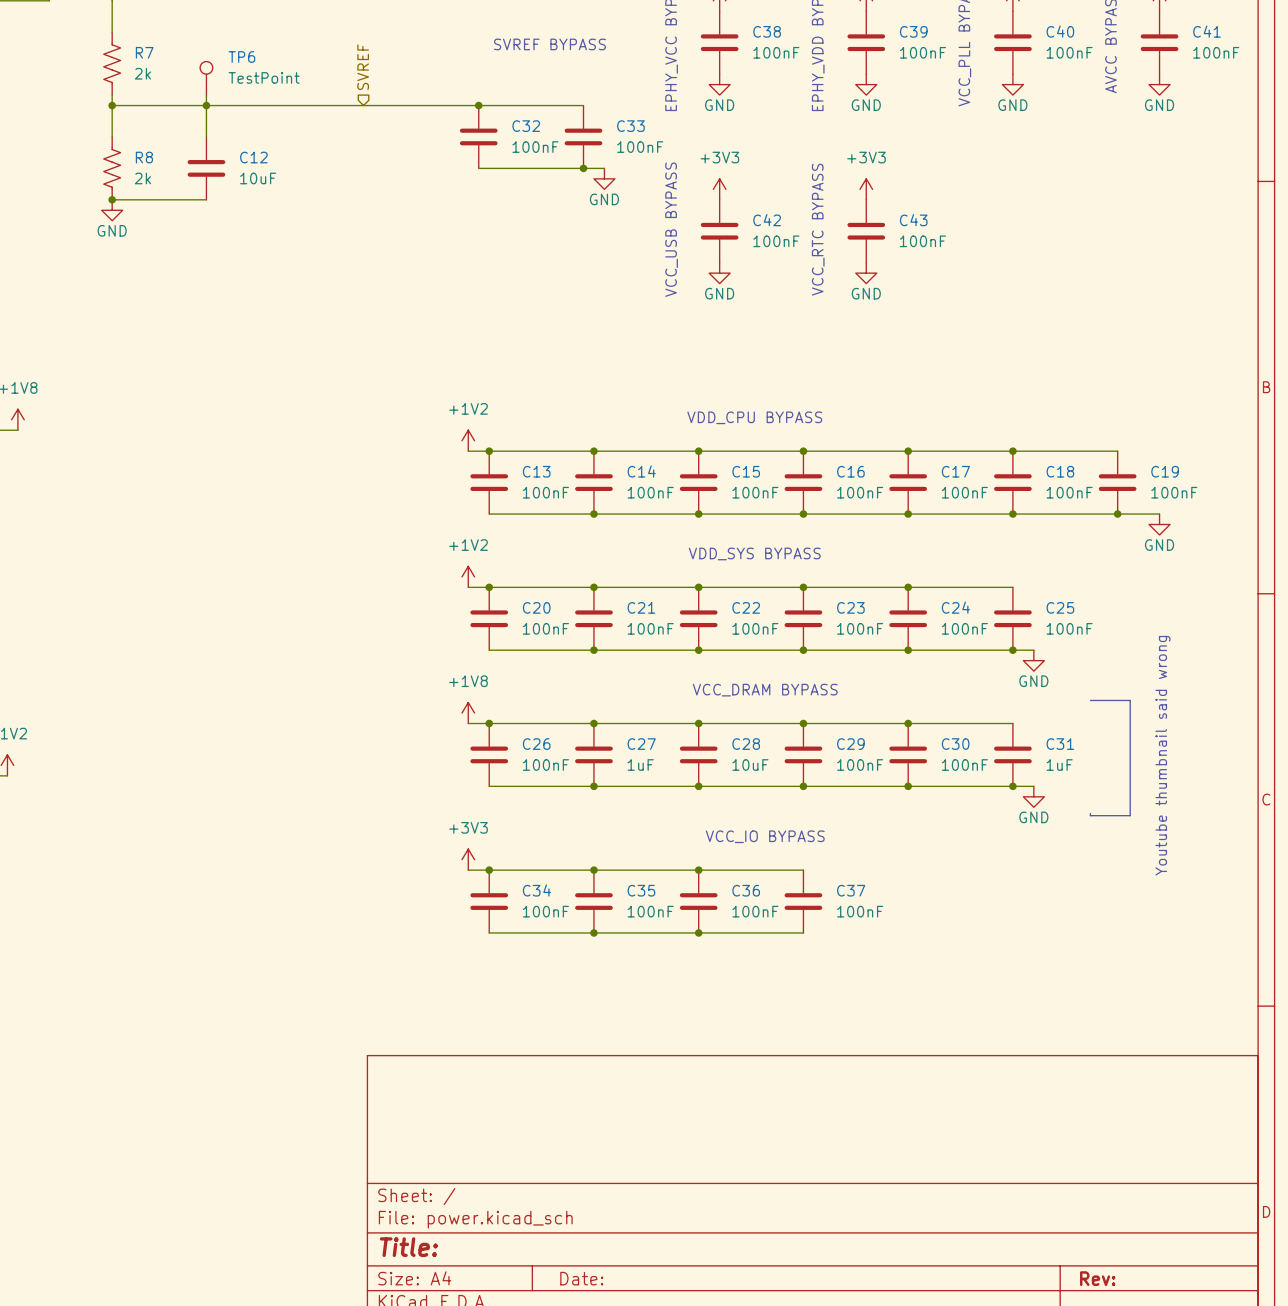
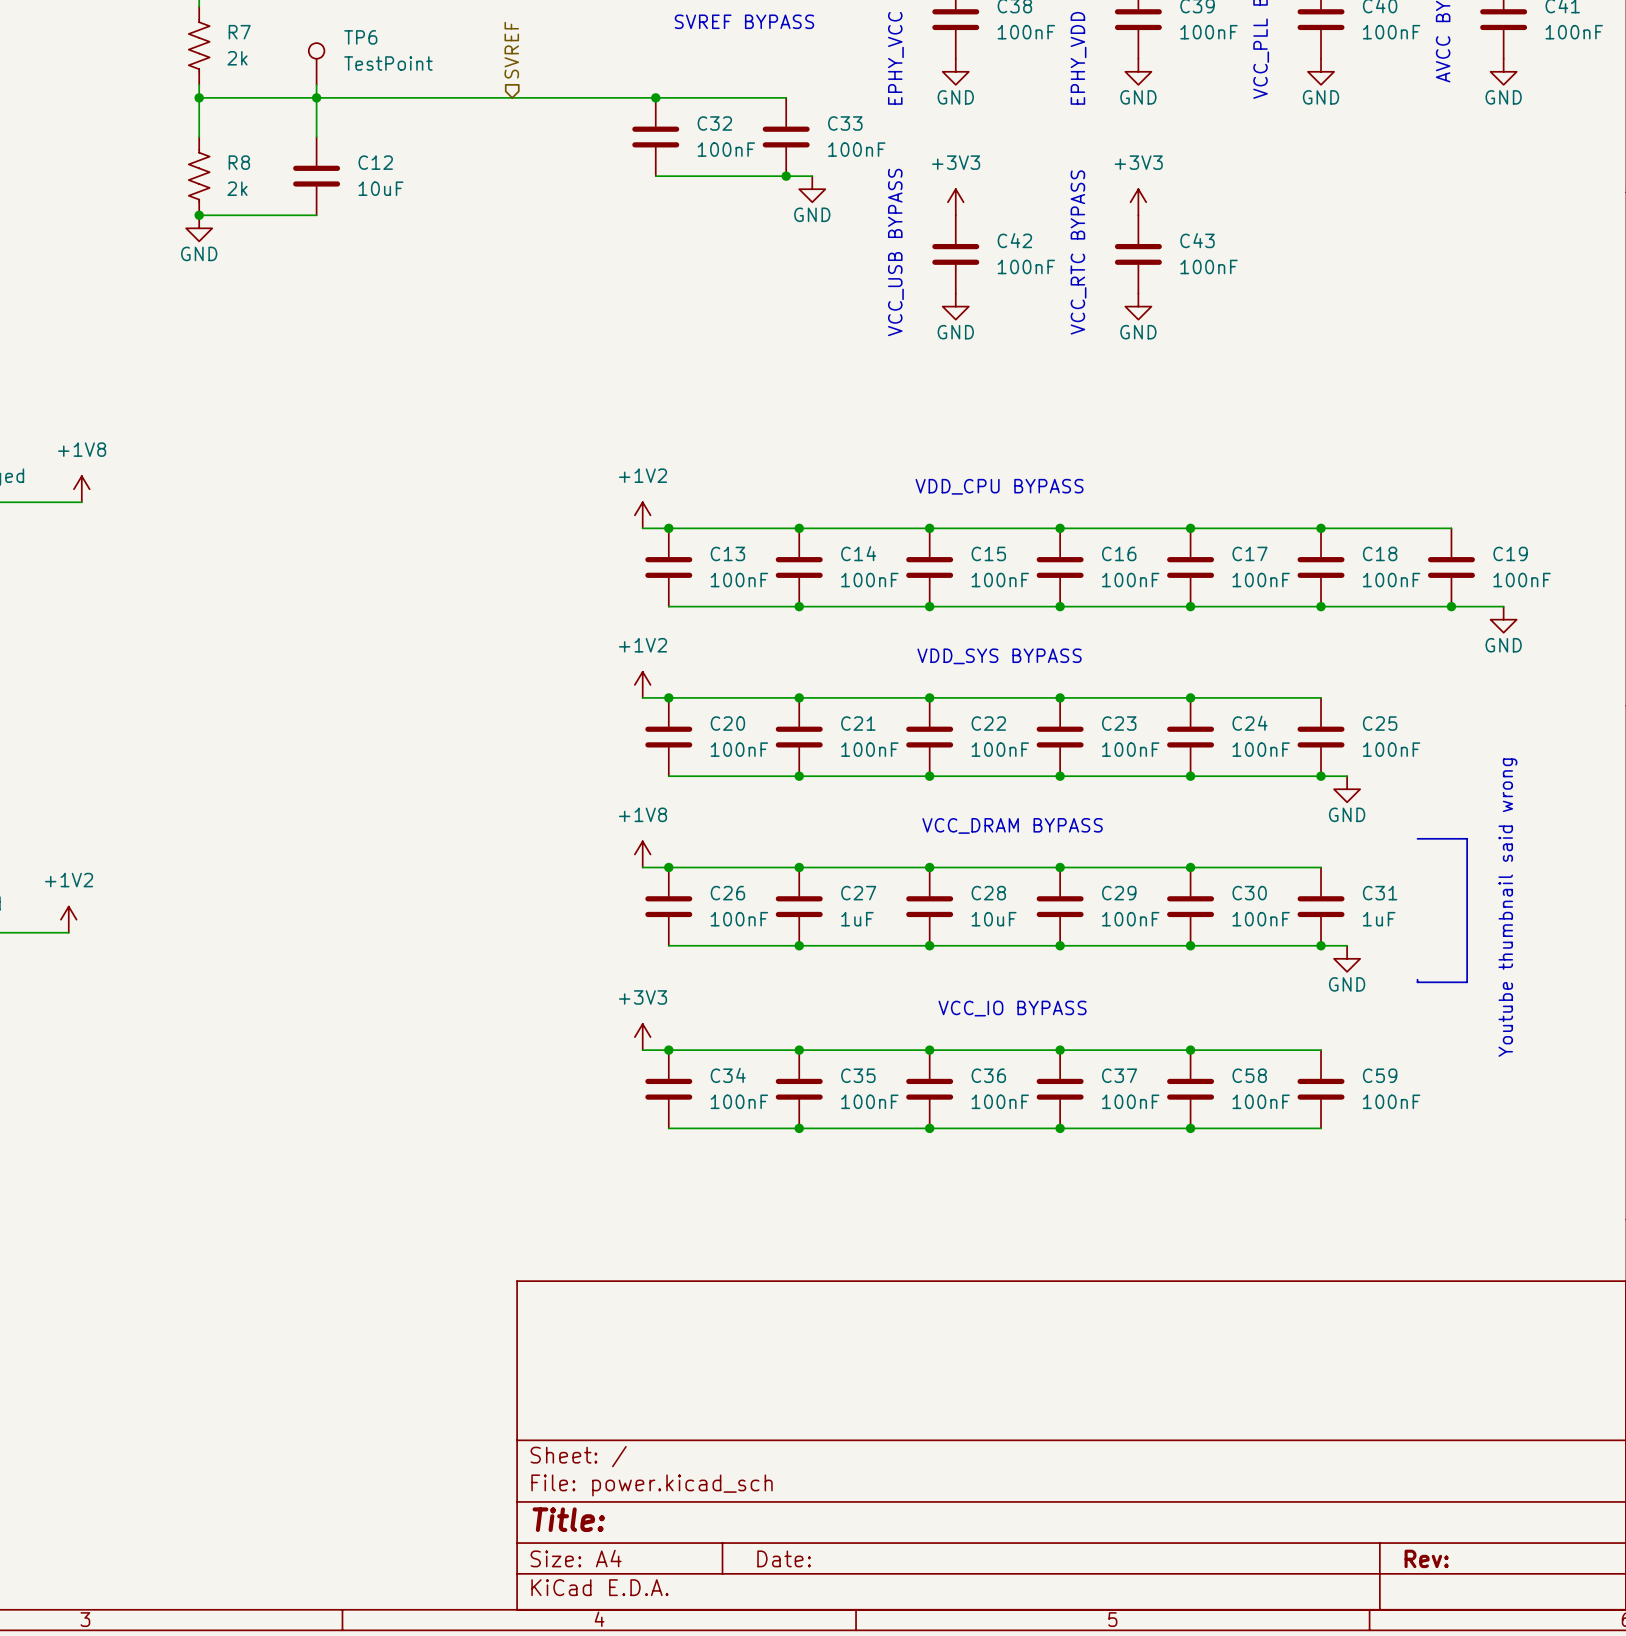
wire: none -> (1060, 1050) (1321, 1050)
junction: none -> (1060, 1050)
junction: none -> (1190, 1050)
C58: none -> 100nF (1190, 1089)
C59: none -> 100nF (1321, 1089)
wire: none -> (1060, 1128) (1321, 1128)
junction: none -> (1060, 1128)
junction: none -> (1190, 1128)

